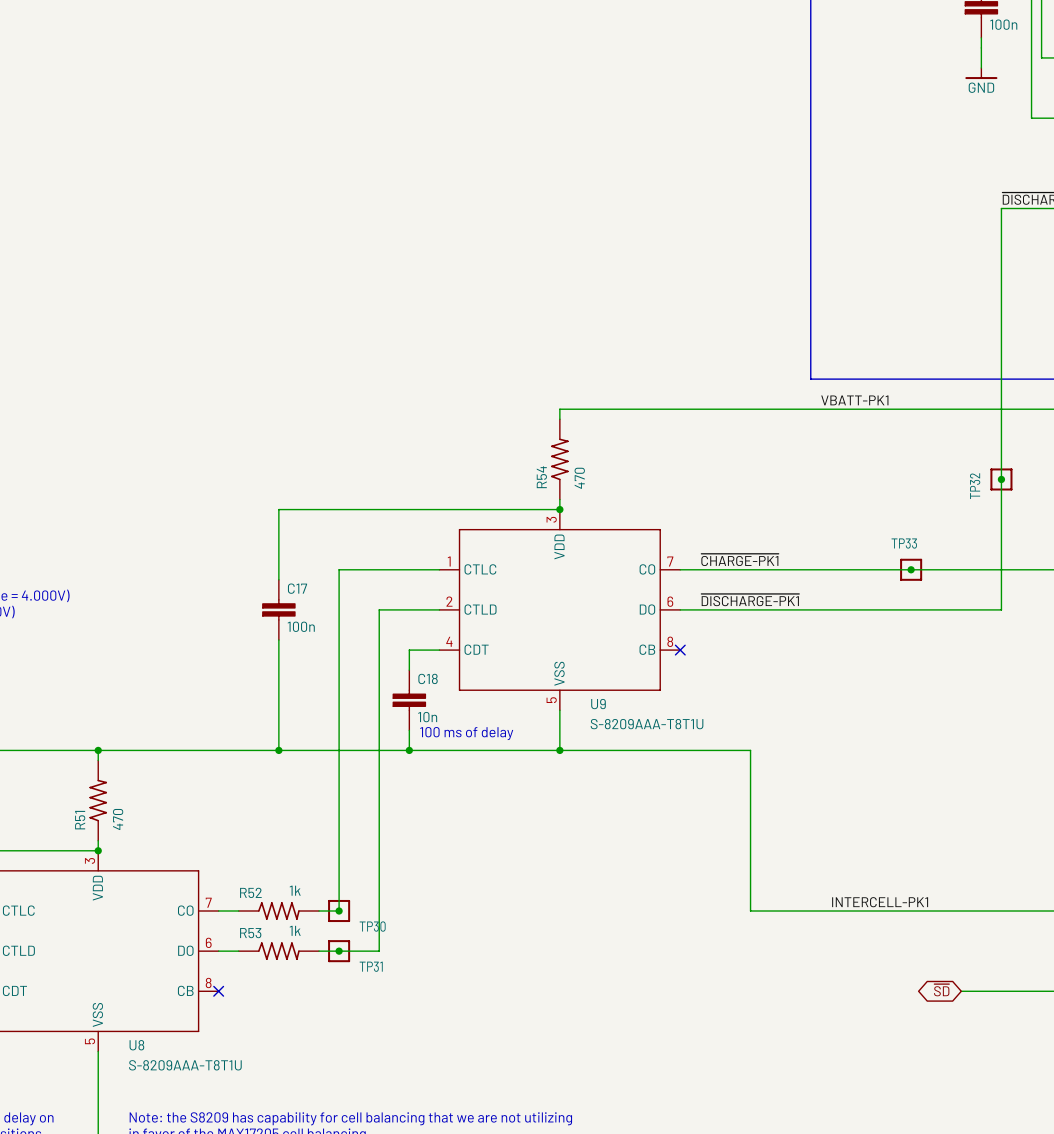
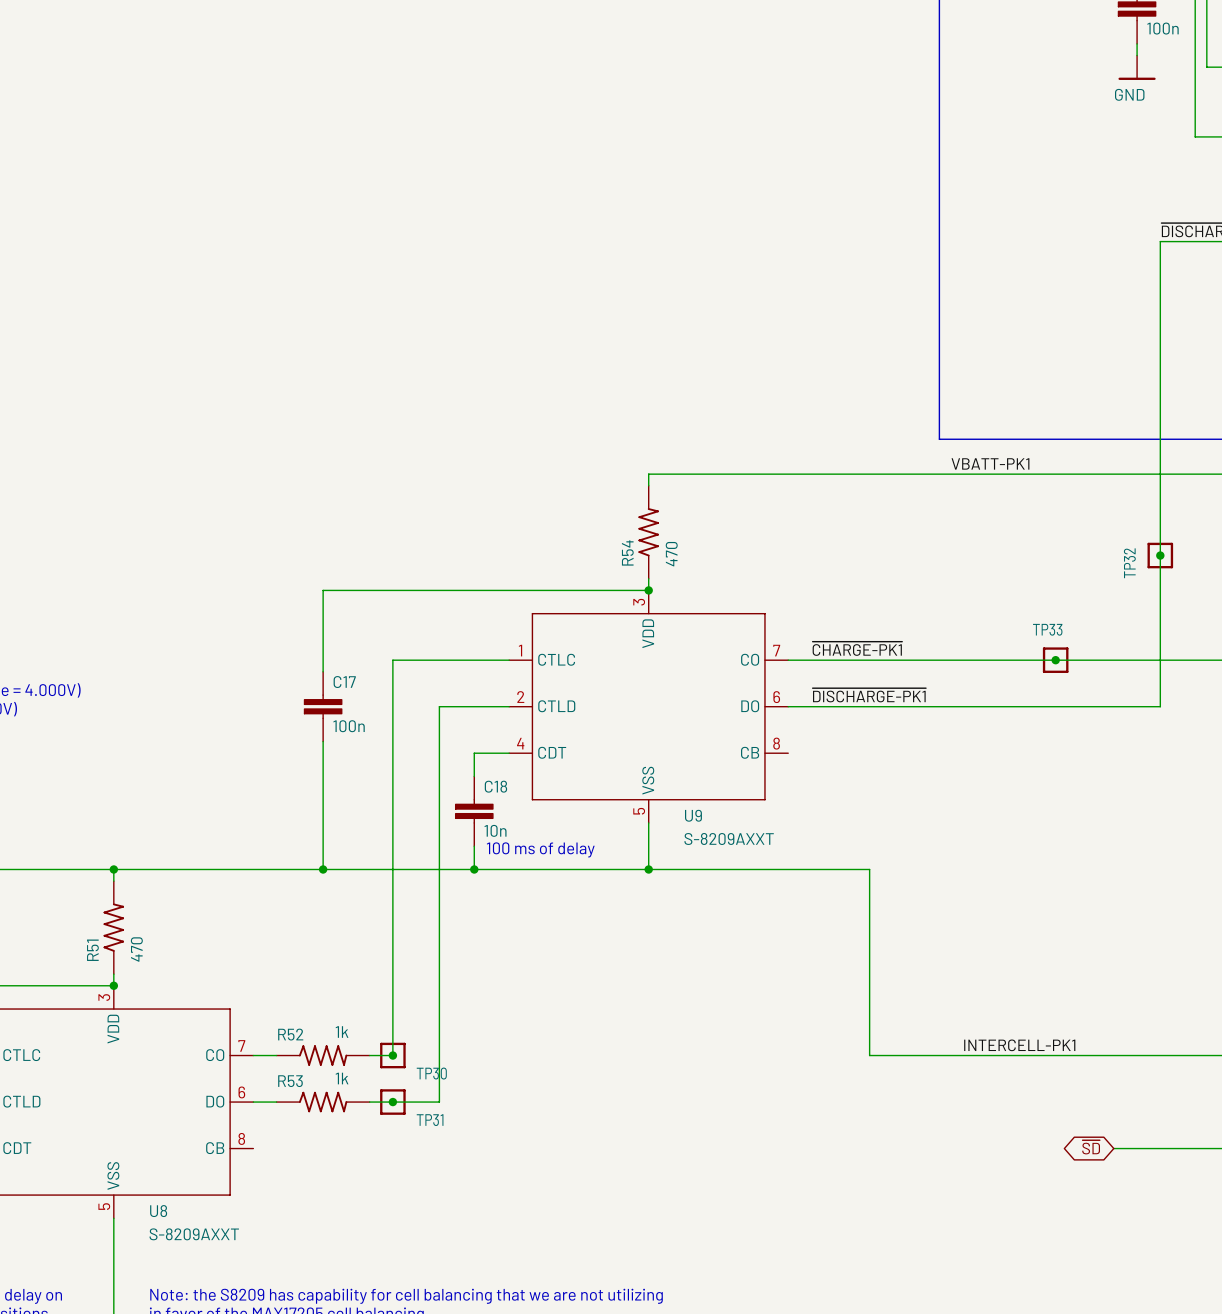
power symbol: none -> GND (1137, 67)
power symbol: GND (981, 73) -> none
no-connect mark: (680, 650) -> none
U9 value: S-8209AAA-T8T1U (647, 724) -> S-8209AXXT (729, 838)
no-connect mark: (218, 991) -> none
U8 value: S-8209AAA-T8T1U (185, 1065) -> S-8209AXXT (194, 1234)

